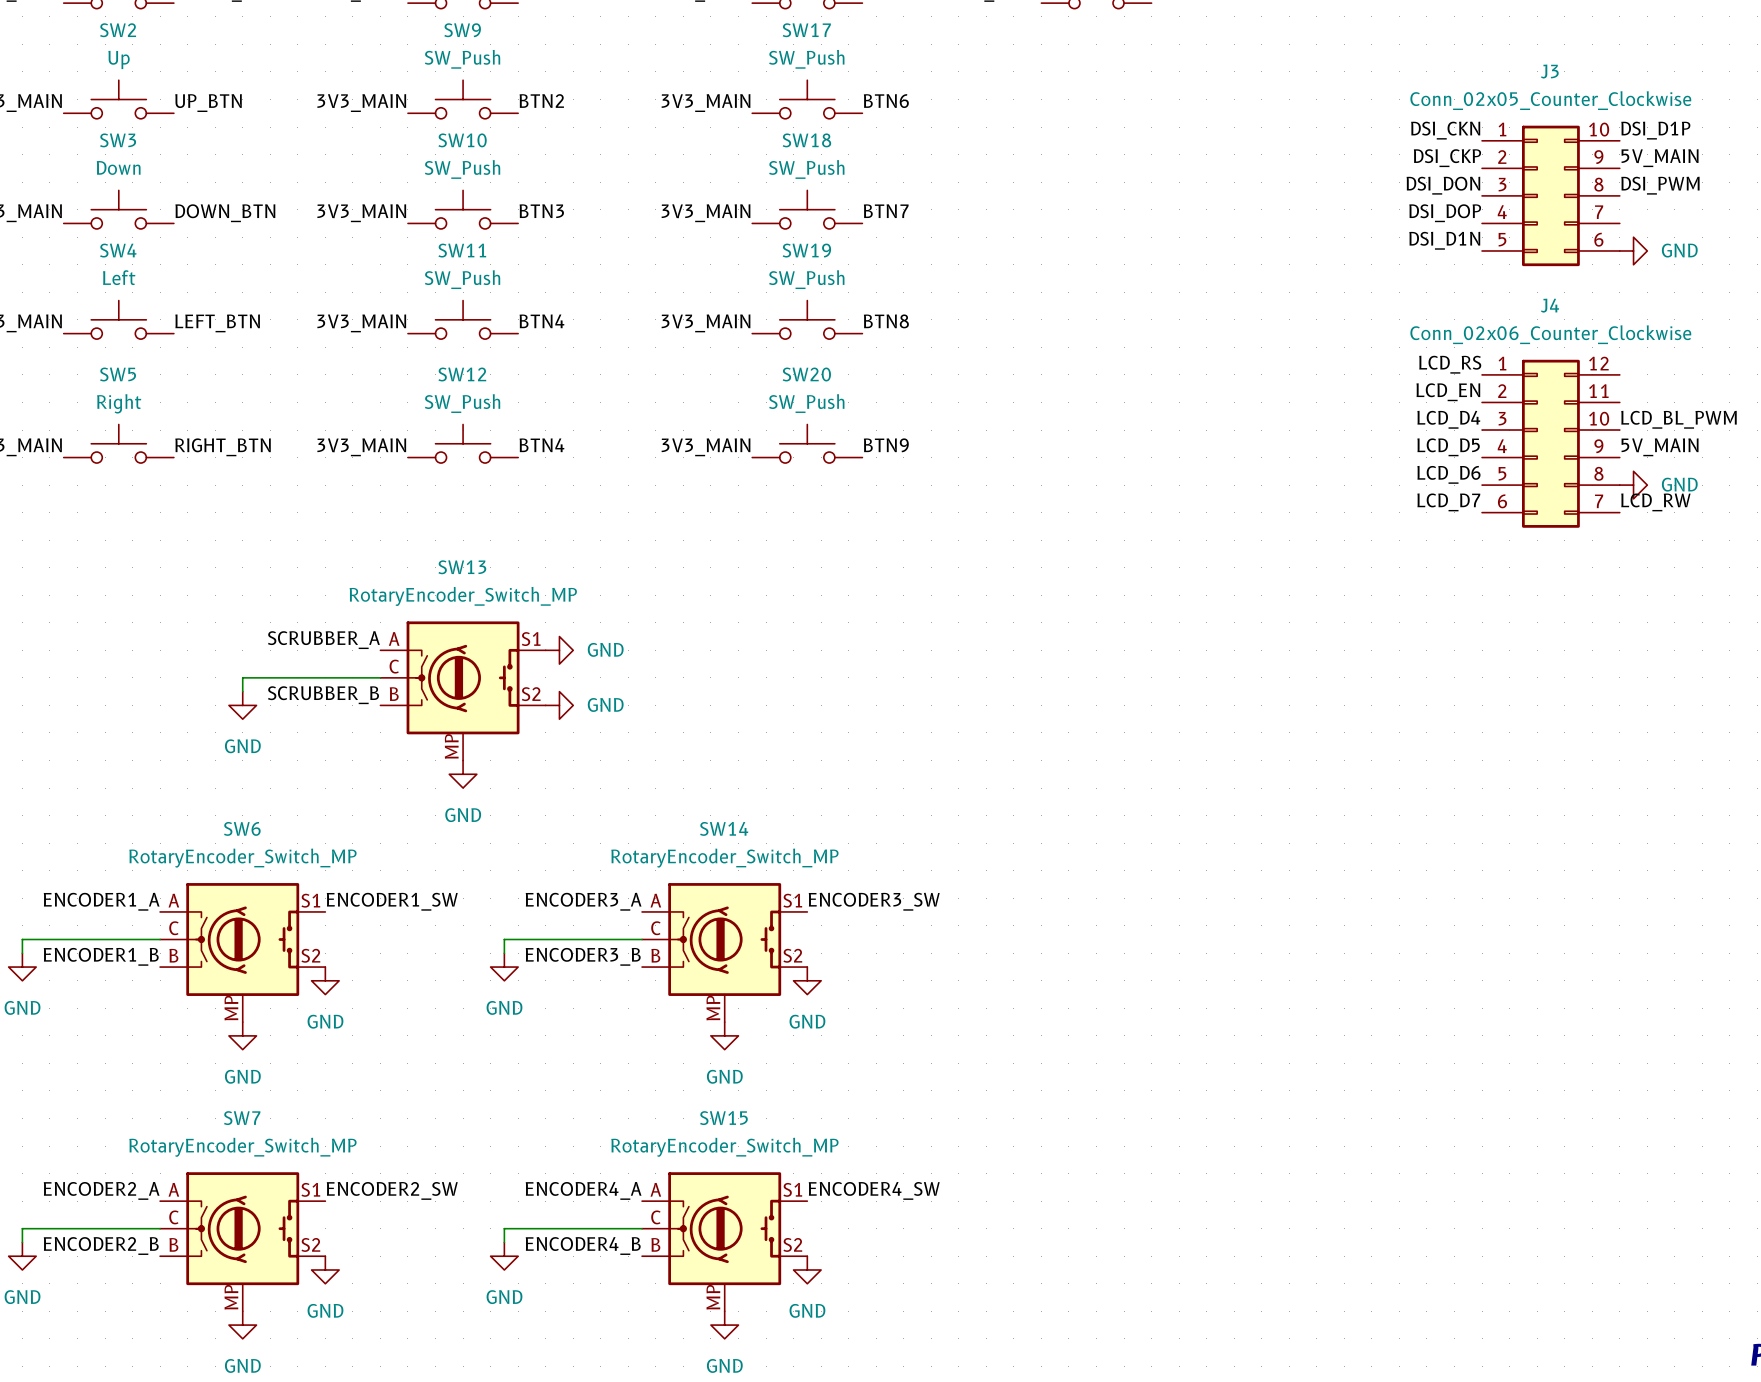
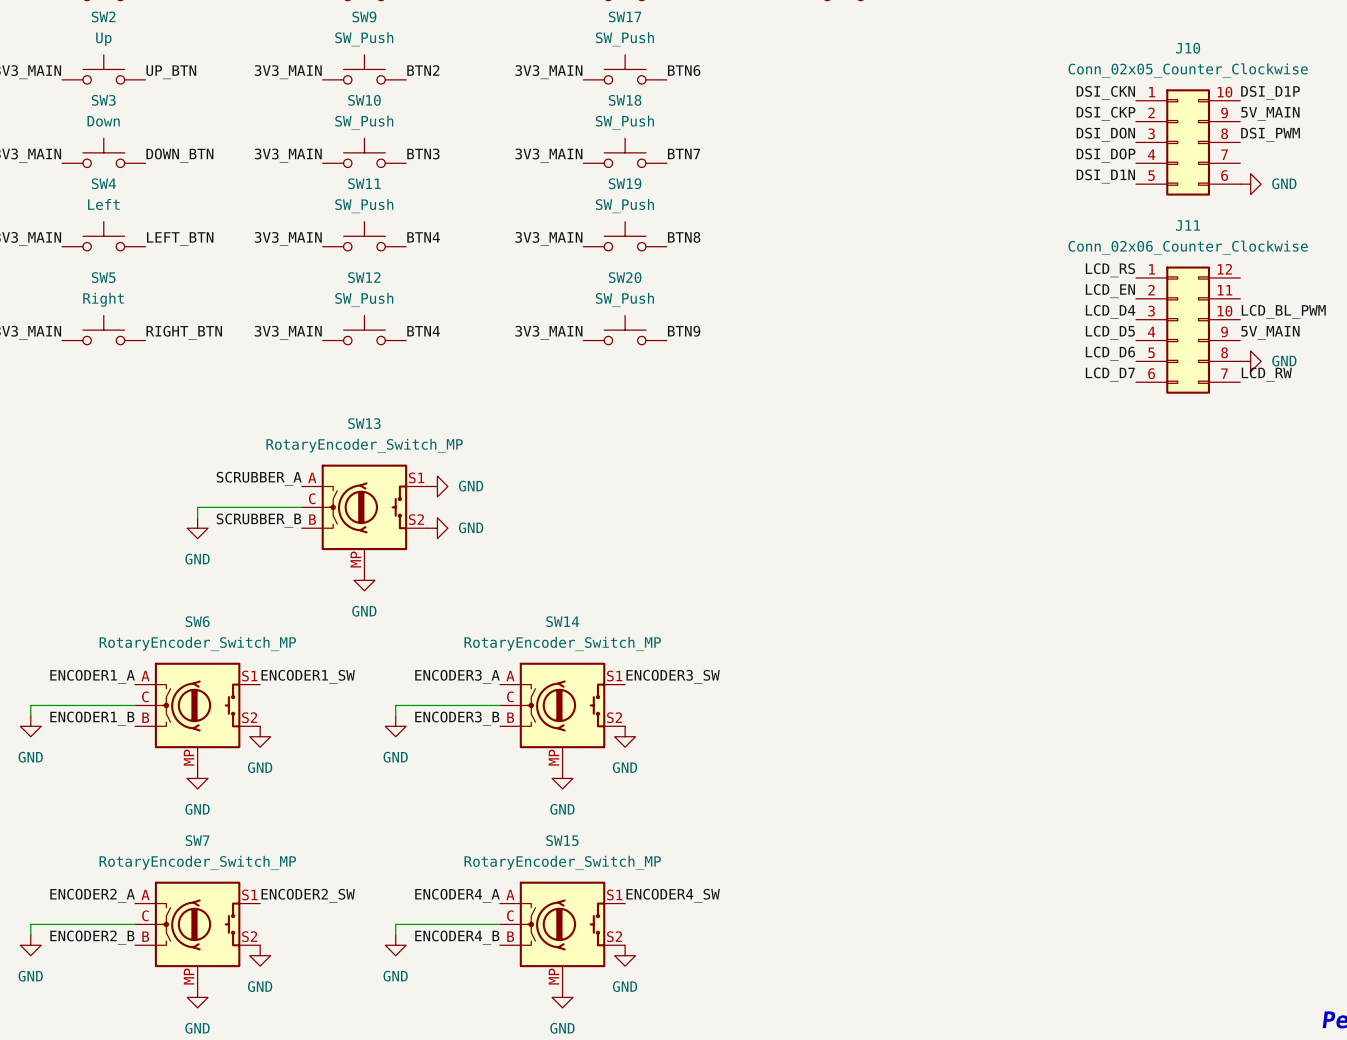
J3 name: J3 (1549, 71) -> J10 (1188, 48)
J4 name: J4 (1550, 305) -> J11 (1188, 225)

